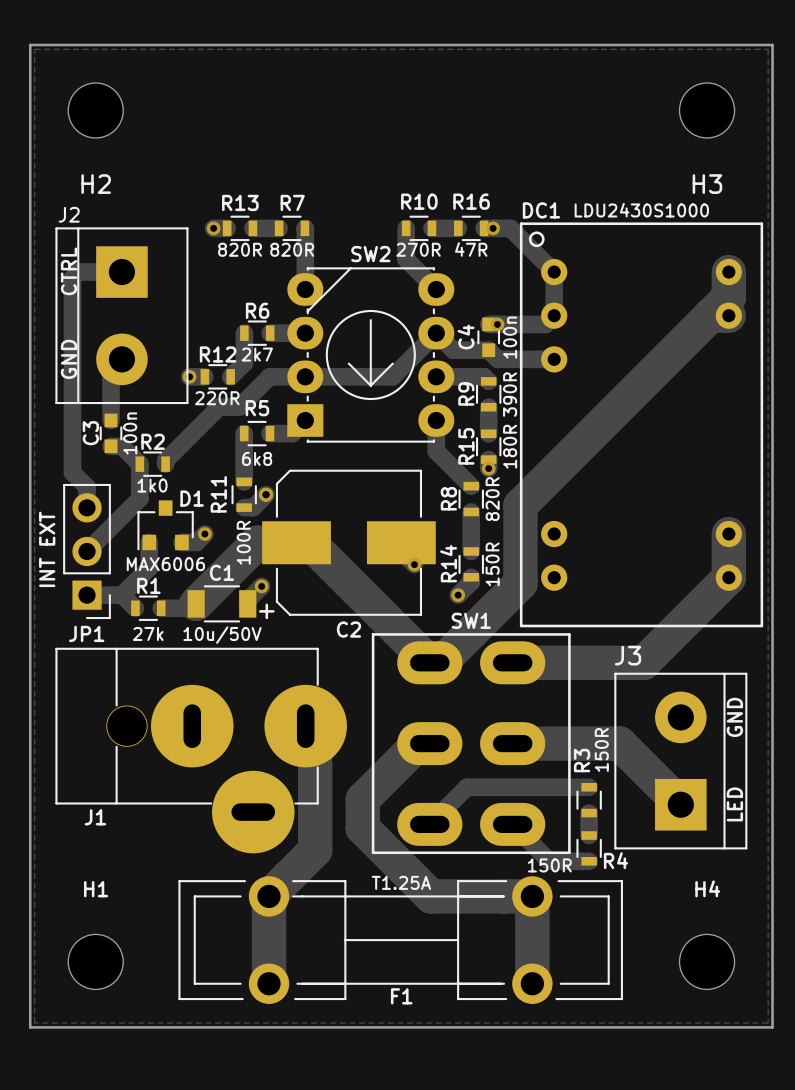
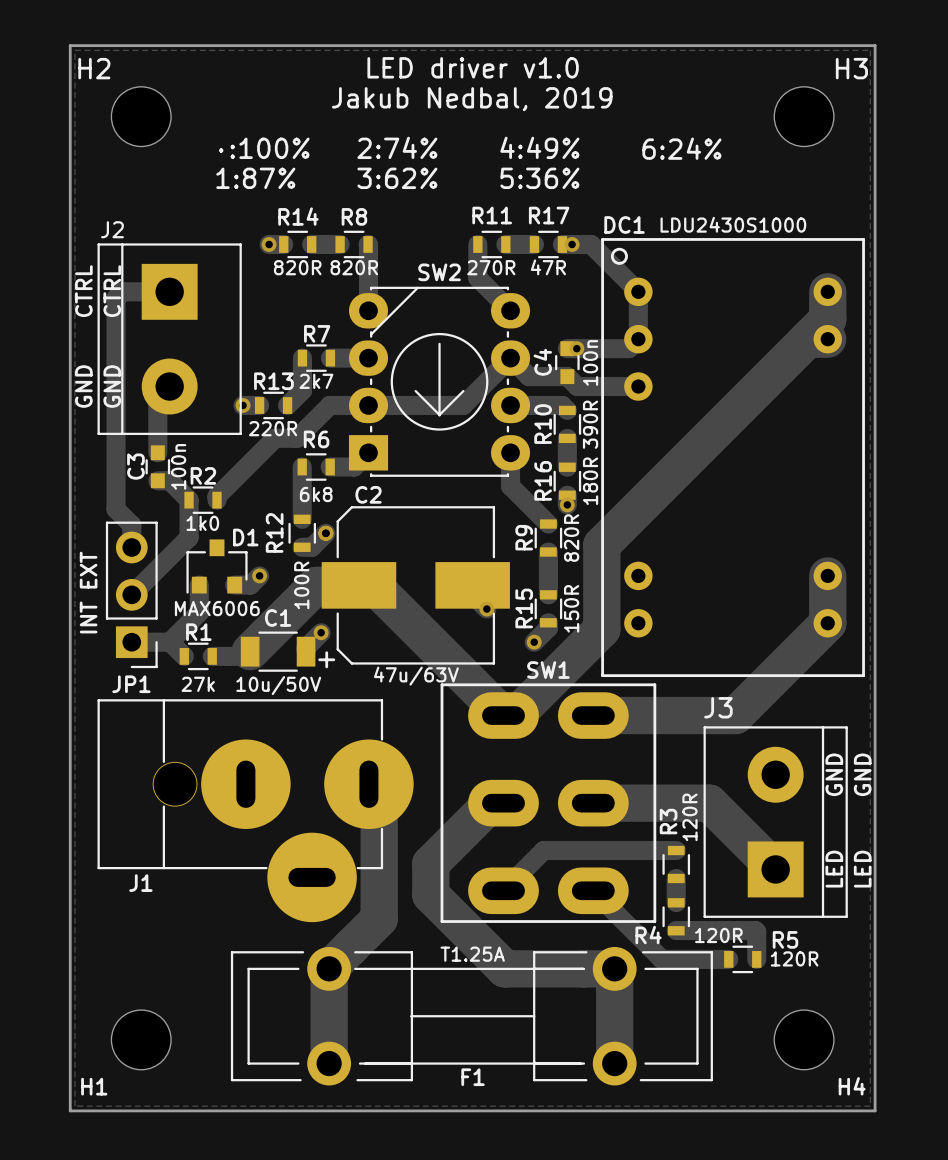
text: none -> LED driver v1.0 (473, 67)
text: none -> Jakub Nedbal, 2019 (472, 99)
text: none -> ·:100% (264, 148)
text: none -> 2:74% (397, 147)
text: none -> 4:49% (539, 147)
text: none -> 6:24% (681, 148)
text: none -> 1:87% (255, 178)
text: none -> 3:62% (397, 178)
text: none -> 5:36% (539, 178)
H2 name position: H2 (96, 184) -> H2 (94, 68)
H3 name position: H3 (707, 184) -> H3 (851, 68)
R10 name: R10 (419, 201) -> R11 (492, 215)
R16 name: R16 (471, 201) -> R17 (549, 215)
R13 name: R13 (240, 202) -> R14 (298, 216)
R7 name: R7 (292, 202) -> R8 (354, 216)
text: none -> CTRL (83, 291)
R6 name: R6 (257, 310) -> R7 (317, 333)
R12 name: R12 (218, 354) -> R13 (273, 381)
text: none -> GND (83, 386)
R9 name: R9 (466, 393) -> R10 (543, 424)
R5 name: R5 (257, 408) -> R6 (316, 439)
R15 name: R15 (466, 446) -> R16 (543, 480)
R11 name: R11 (218, 494) -> R12 (274, 532)
R8 name: R8 (448, 498) -> R9 (524, 537)
R14 name: R14 (448, 563) -> R15 (524, 608)
C2 value: none -> 47u/63V (416, 676)
C2 name position: C2 (348, 629) -> C2 (368, 494)
text: none -> GND (862, 774)
R3 value: 150R (601, 749) -> 120R (689, 817)
text: none -> LED (862, 869)
R4 name position: R4 (615, 860) -> R4 (648, 935)
track: (549, 861) (589, 861) -> (633, 930) (661, 959) (728, 959)
track: none -> (676, 930) (755, 930) (756, 959)
R4 value: 150R (549, 865) -> 120R (718, 935)
R5: none -> 120R (742, 959)
H4 name position: H4 (707, 888) -> H4 (852, 1086)
H1 name position: H1 (96, 889) -> H1 (94, 1086)

